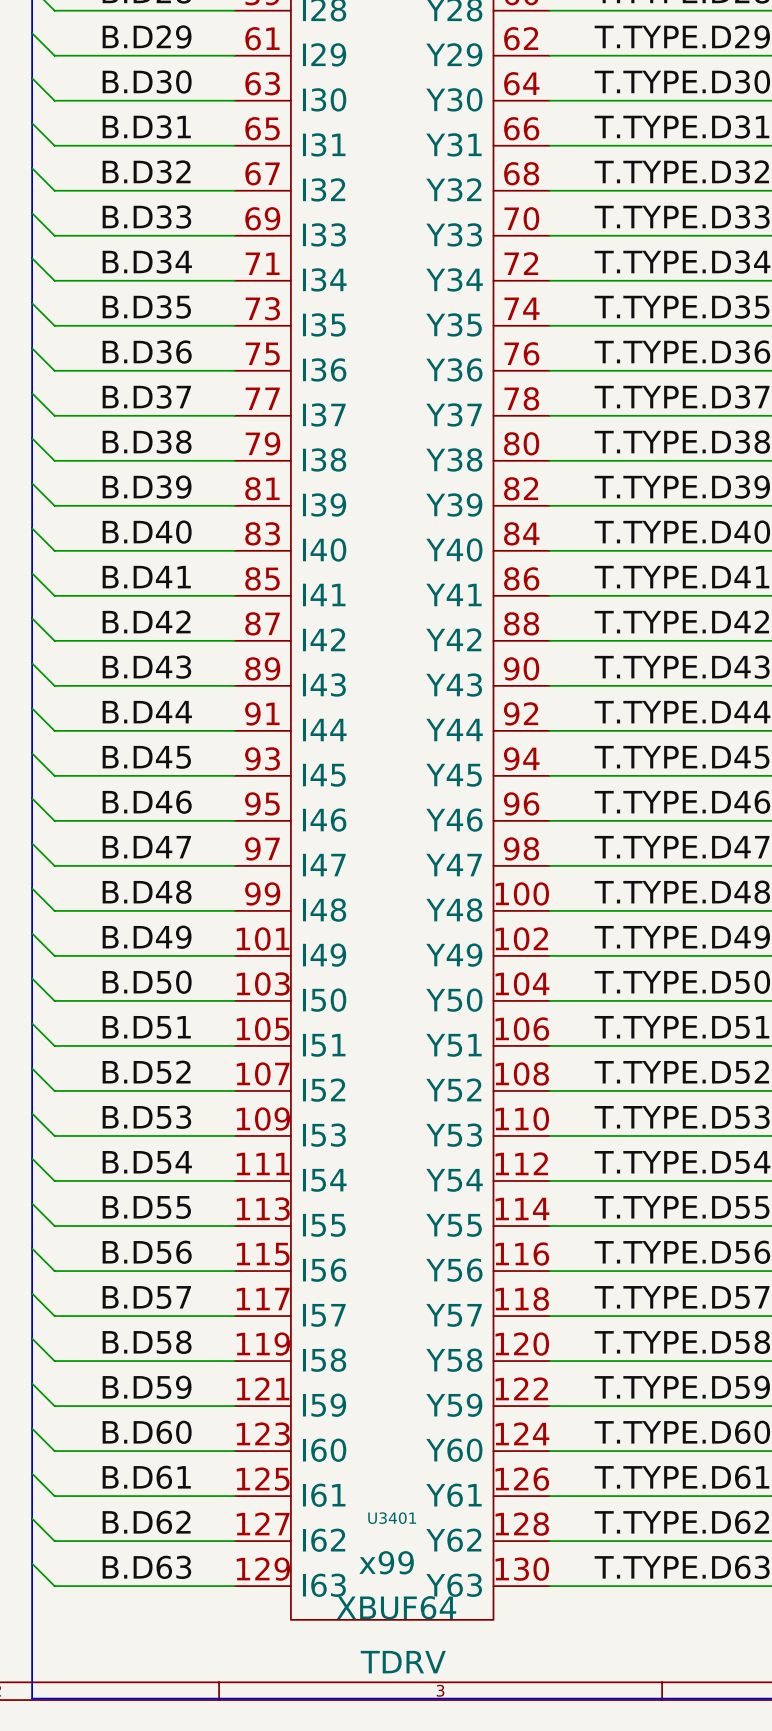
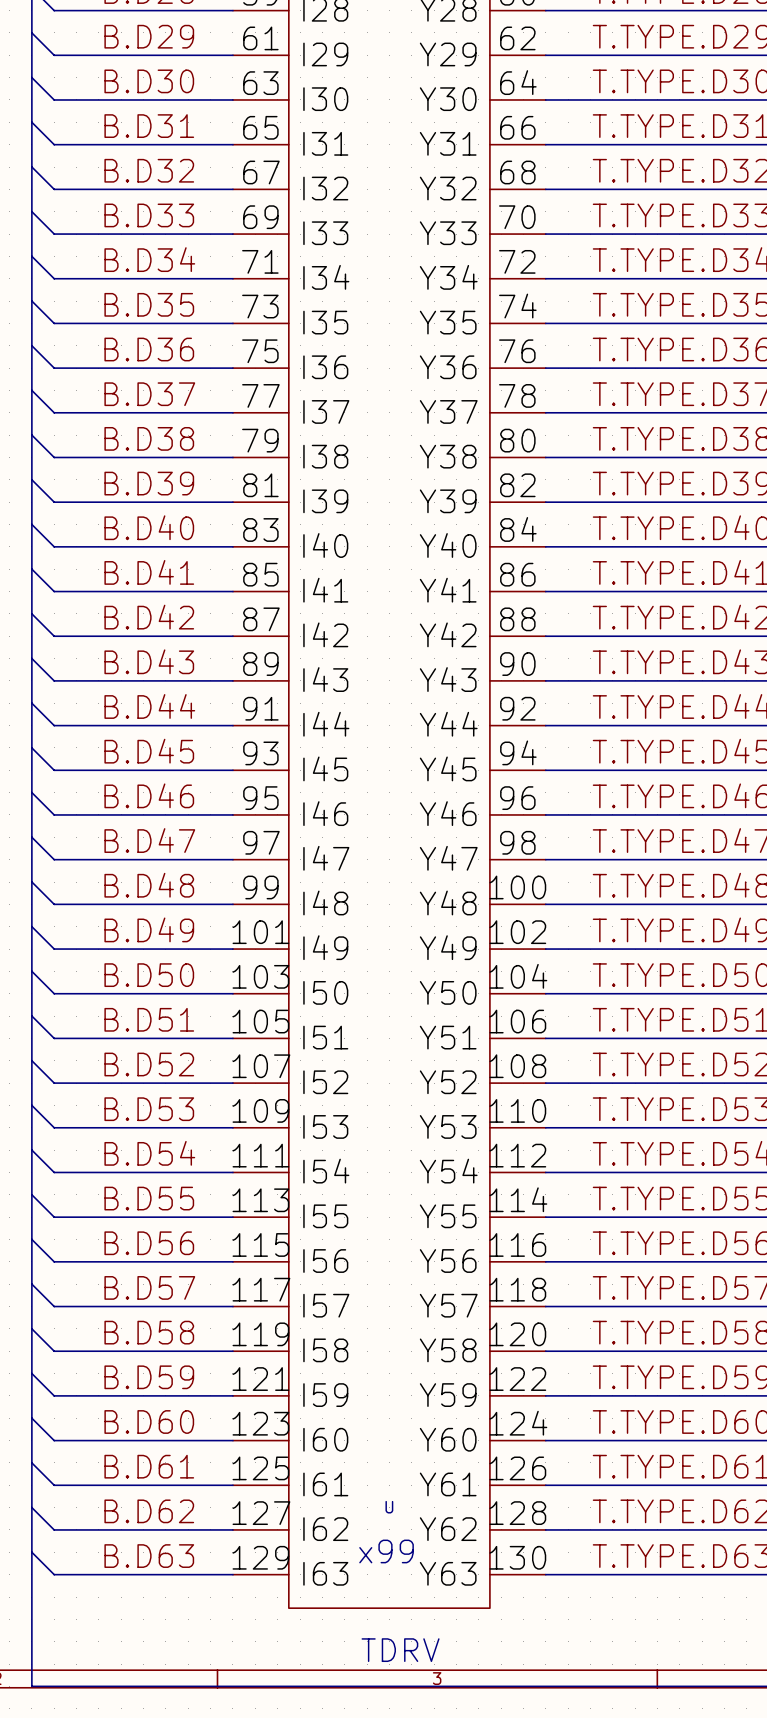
U3401 name: U3401 (392, 1518) -> U (389, 1507)
U3401 value: XBUF64 (396, 1607) -> none

